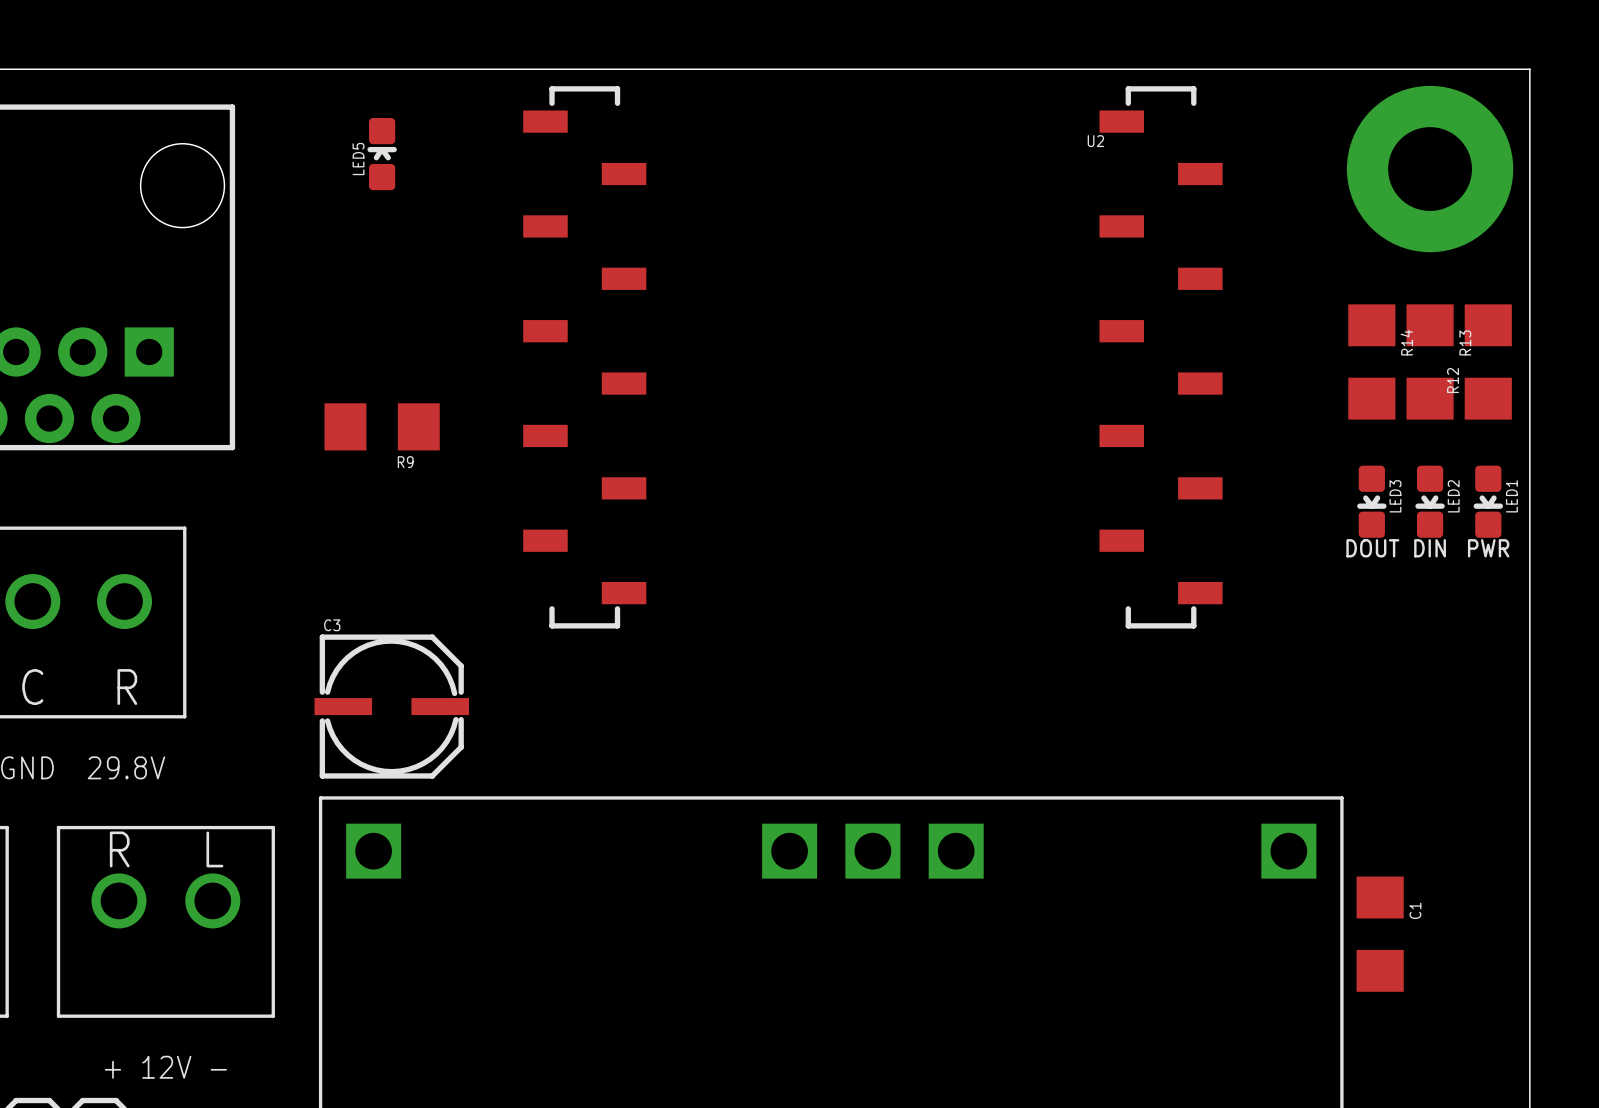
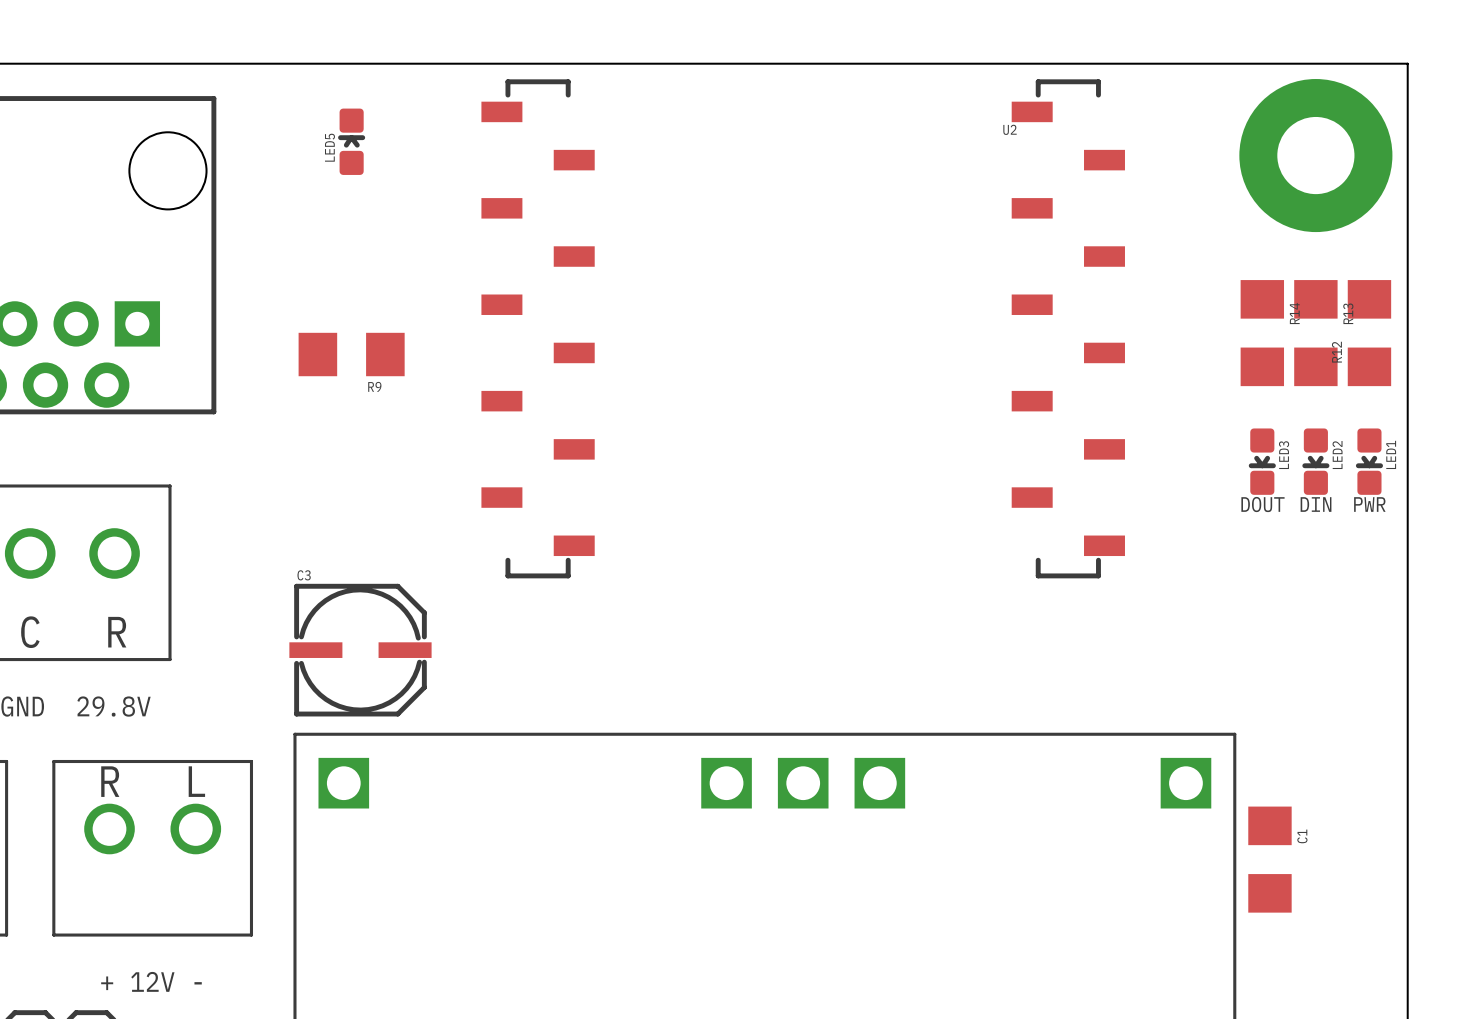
R9 position: (382, 426) -> (351, 354)

